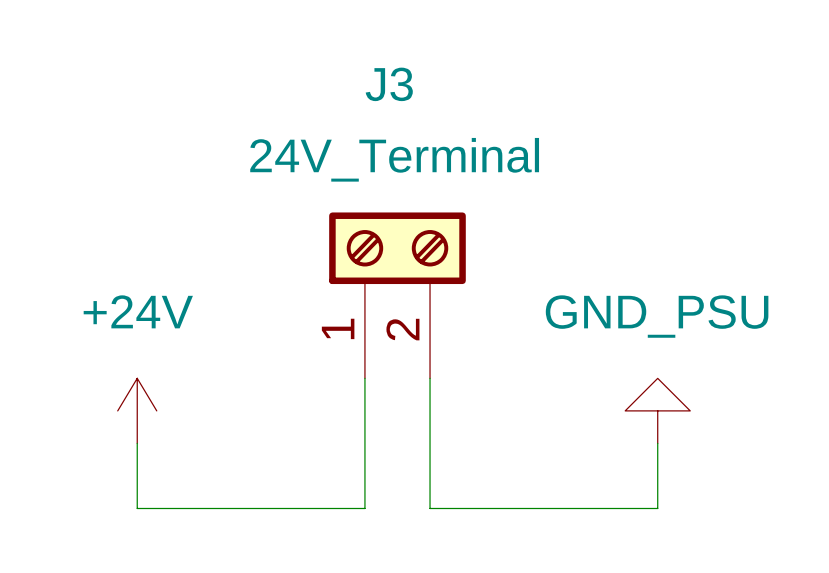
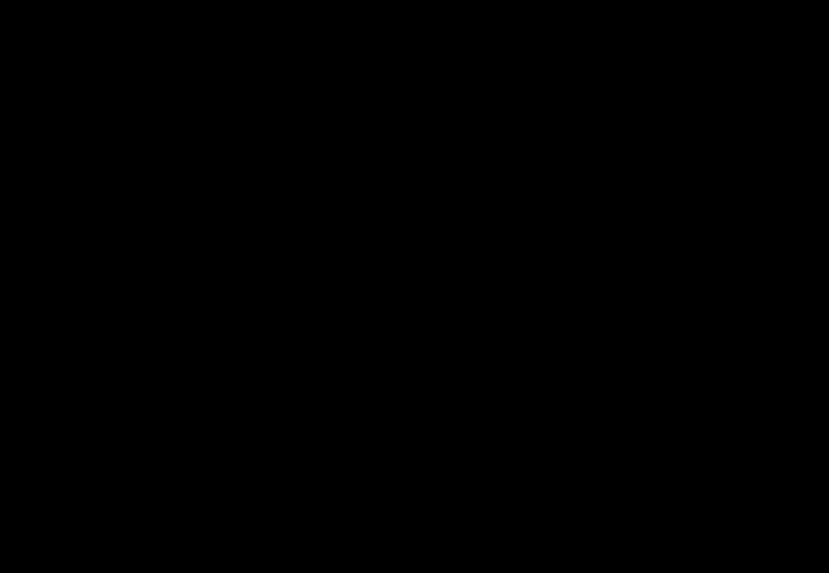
J3: 24V_Terminal (397, 295) -> none
wire: (364, 378) (364, 508) (137, 508) (137, 443) -> none
wire: (430, 378) (430, 508) (657, 508) (657, 443) -> none
power symbol: +24V (137, 410) -> none
power symbol: GND_PSU (657, 410) -> none

